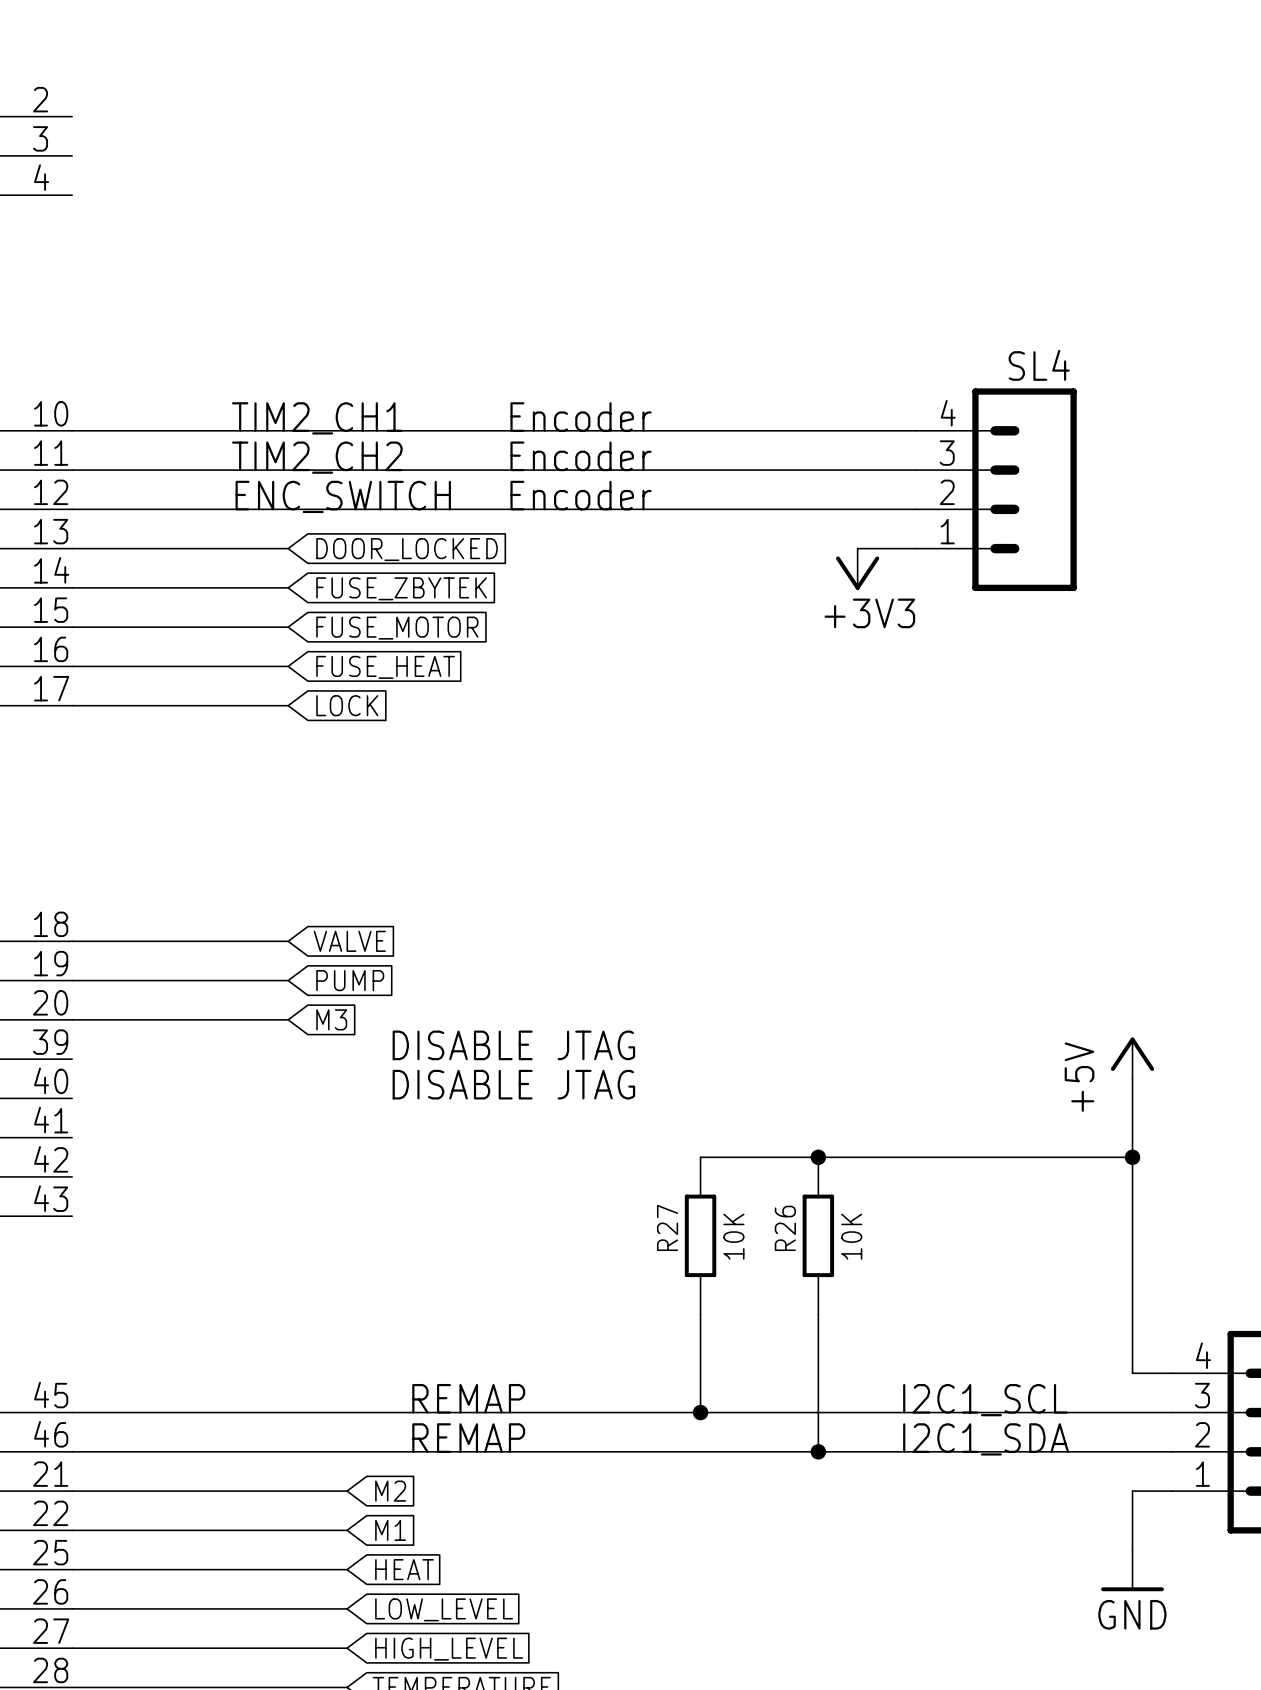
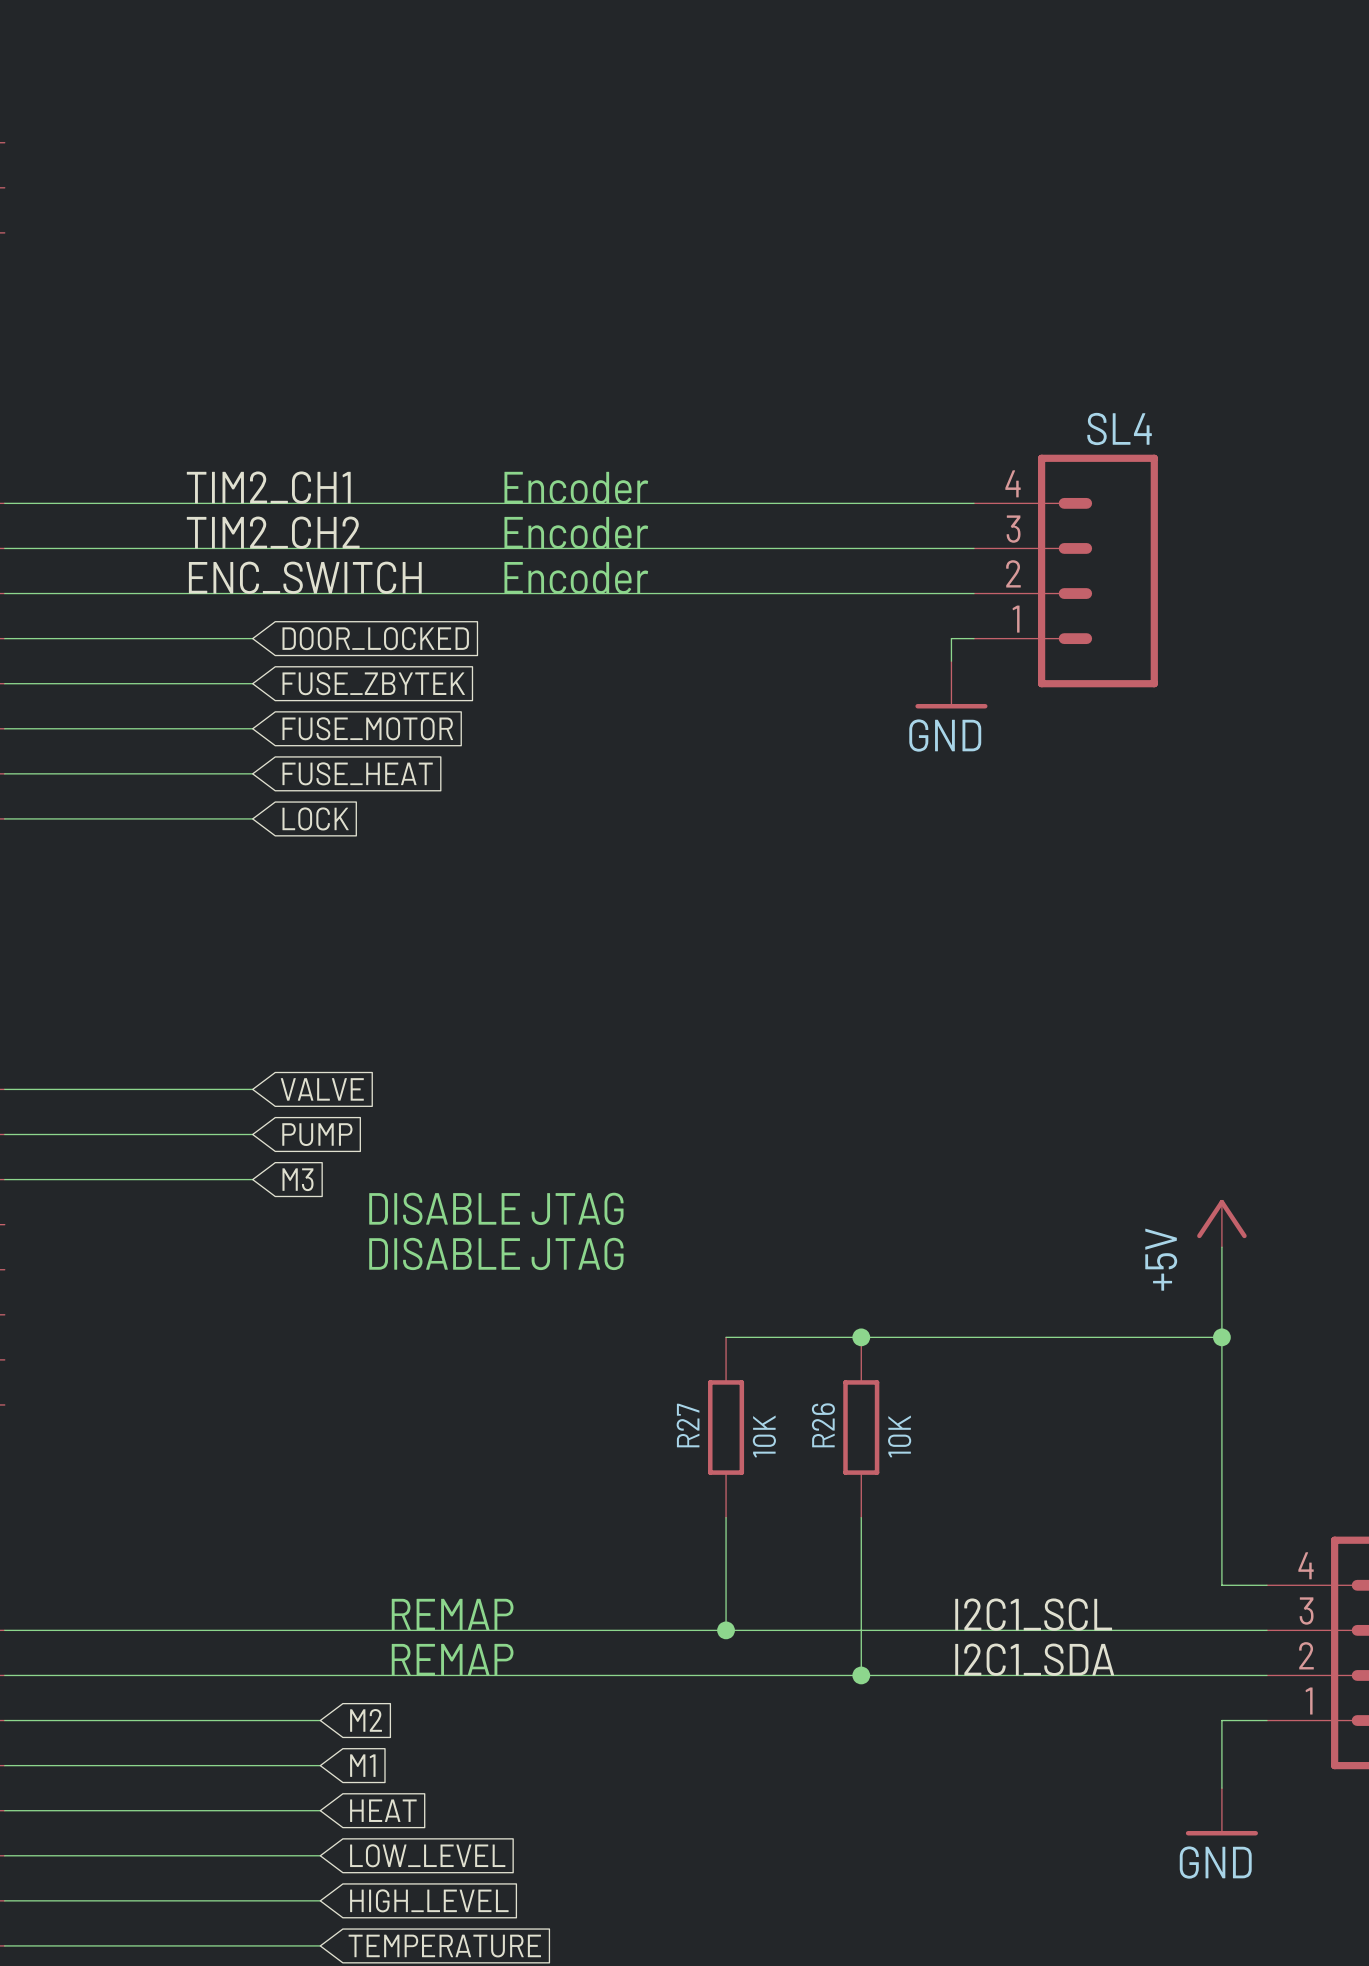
wire: (857, 548) (896, 548) -> (951, 661) (951, 638)
power symbol: +3V3 (857, 569) -> none
power symbol: none -> GND (951, 684)

